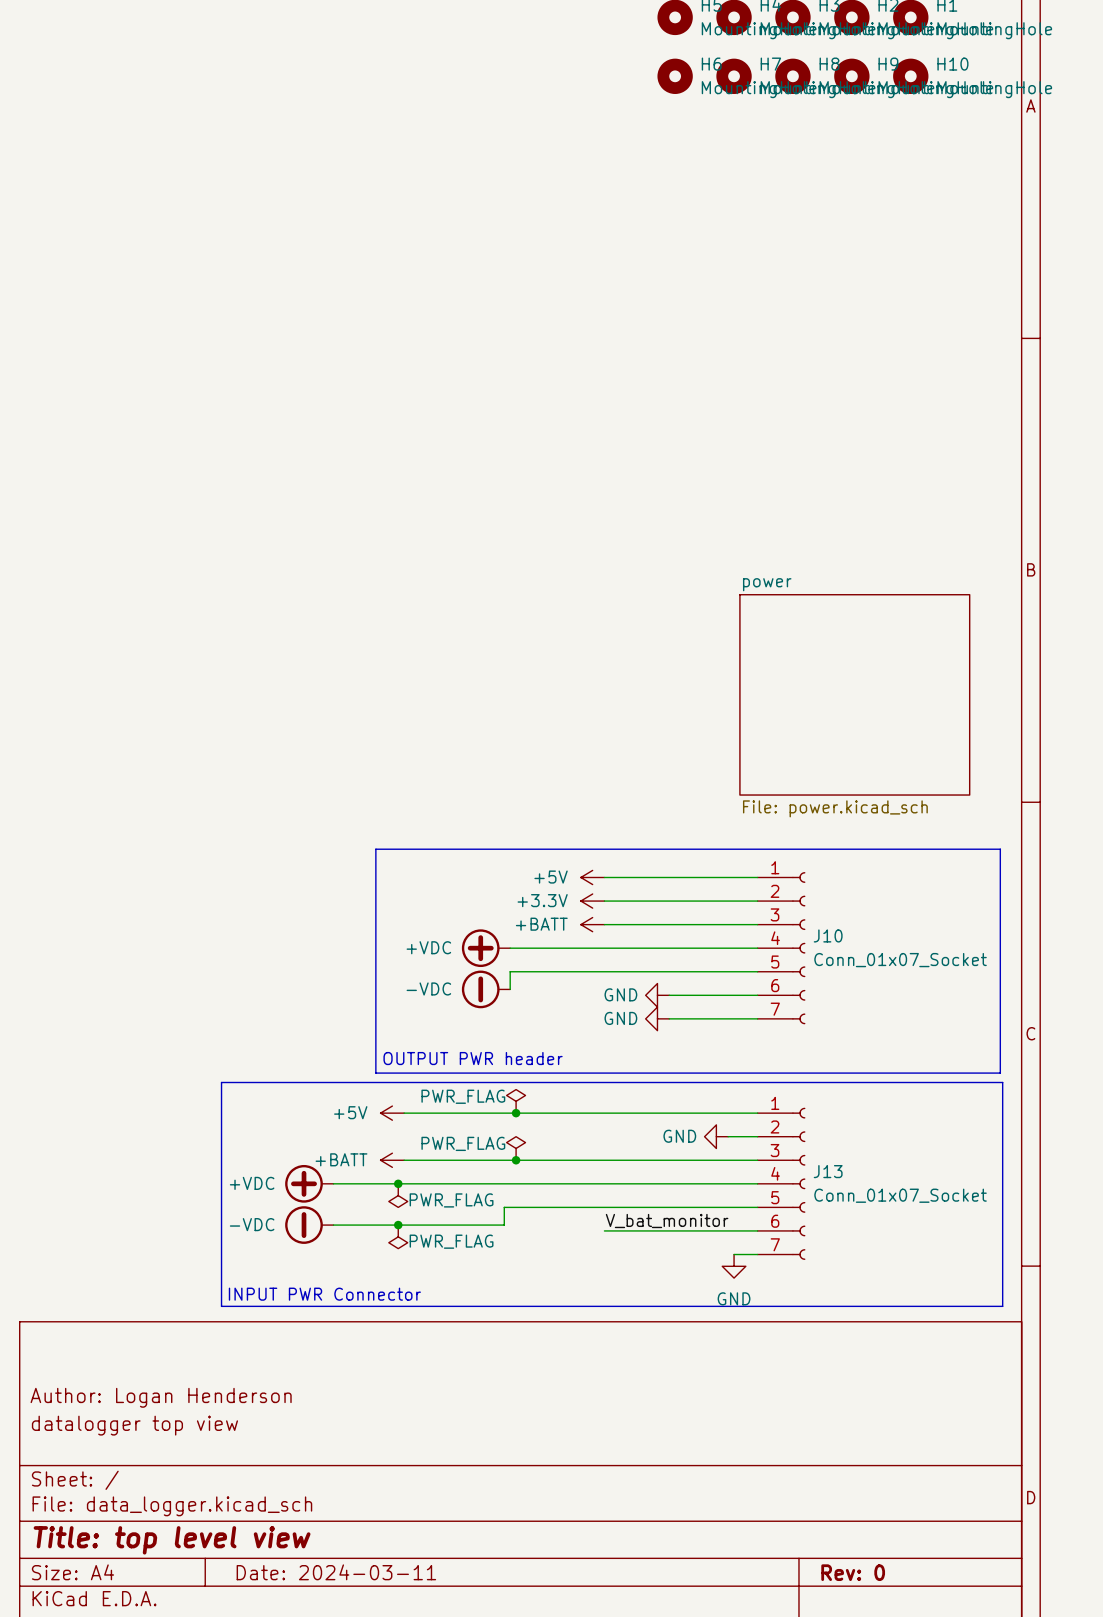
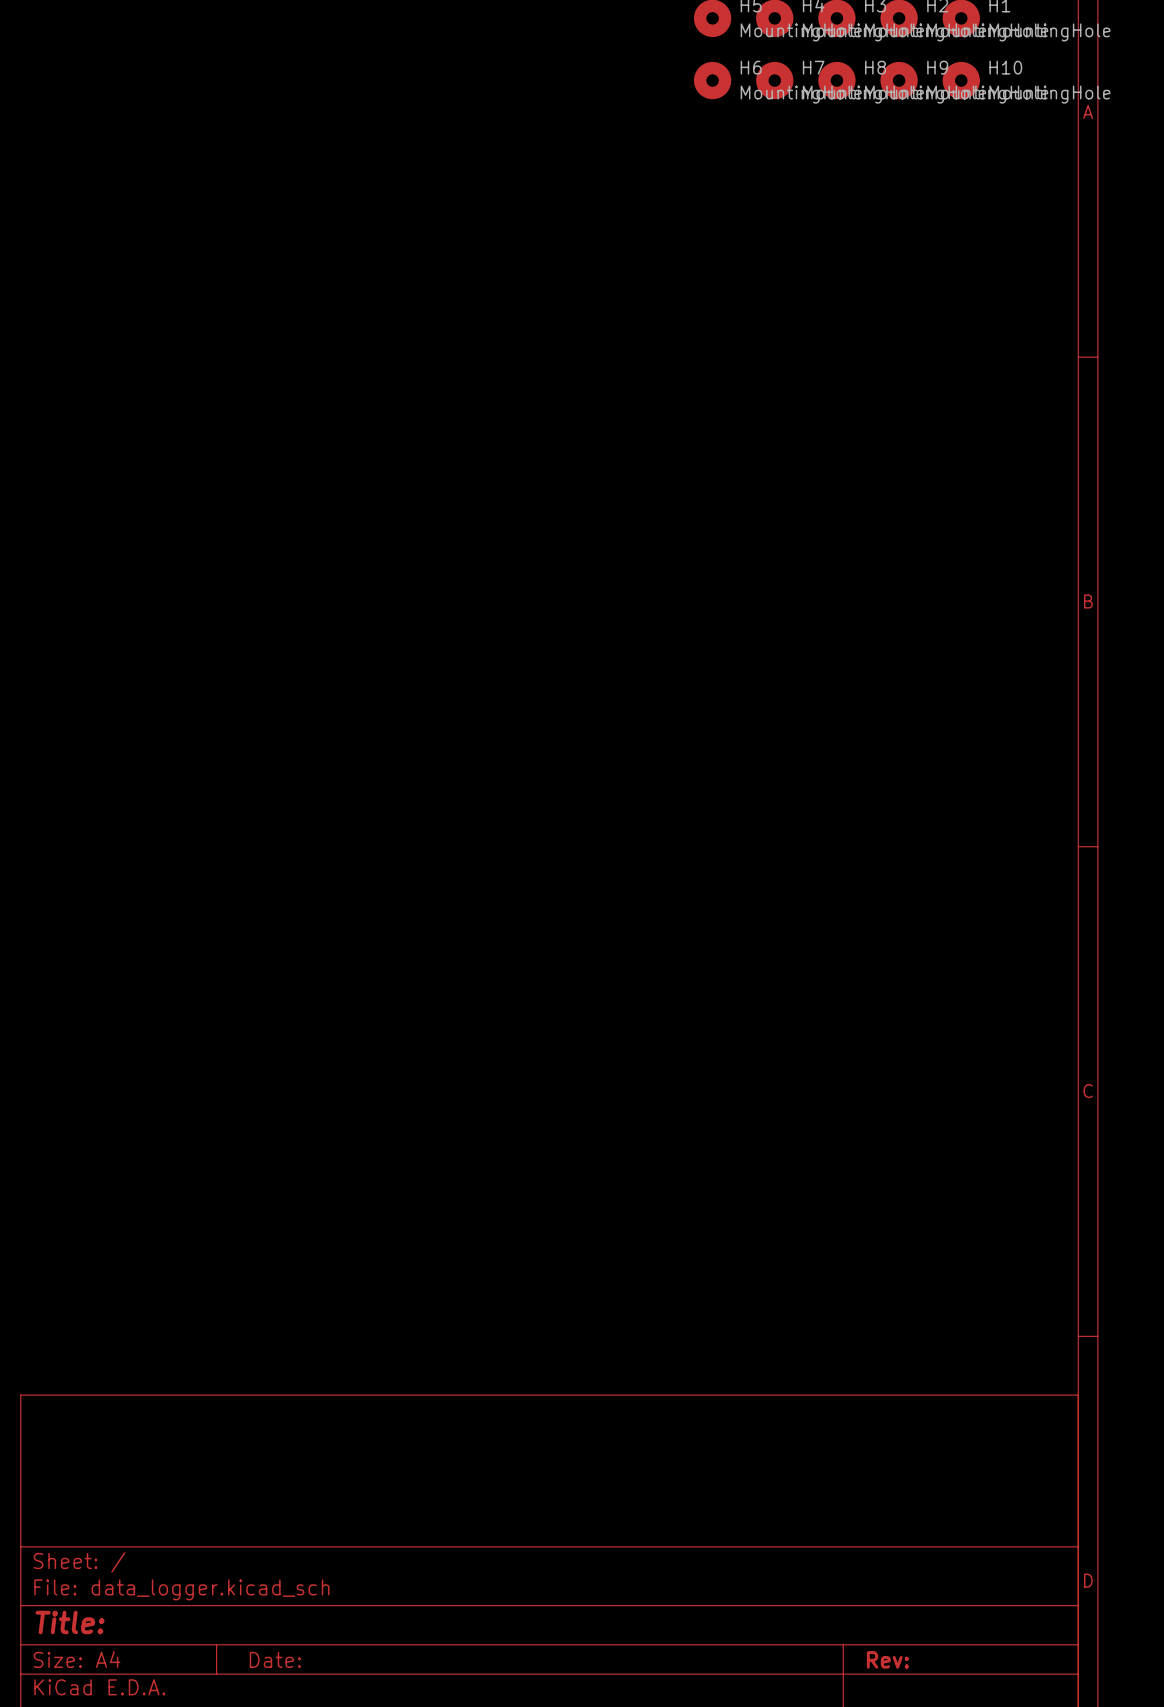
sheet power: File: power.kicad_sch (854, 694) -> none
line: (375, 849) (1000, 849) (1000, 1073) (375, 1073) (375, 849) -> none
power symbol: +5V (592, 877) -> none
wire: (604, 877) (757, 877) -> none
power symbol: +3.3V (592, 901) -> none
wire: (604, 901) (757, 901) -> none
power symbol: +BATT (592, 924) -> none
wire: (604, 924) (757, 924) -> none
power symbol: +VDC (486, 948) -> none
wire: (510, 948) (757, 948) -> none
J10: Conn_01x07_Socket (781, 948) -> none
wire: (757, 971) (510, 971) (510, 989) -> none
power symbol: -VDC (486, 989) -> none
power symbol: GND (657, 995) -> none
wire: (669, 995) (757, 995) -> none
power symbol: GND (657, 1018) -> none
wire: (669, 1018) (757, 1018) -> none
text: OUTPUT PWR header (473, 1058) -> none
line: (221, 1082) (1002, 1082) (1002, 1306) (221, 1306) (221, 1082) -> none
power symbol: PWR_FLAG (516, 1101) -> none
power symbol: +5V (392, 1113) -> none
wire: (404, 1113) (757, 1113) -> none
junction: (516, 1113) -> none
power symbol: GND (716, 1136) -> none
wire: (728, 1136) (757, 1136) -> none
power symbol: PWR_FLAG (516, 1148) -> none
power symbol: +BATT (392, 1160) -> none
wire: (404, 1160) (757, 1160) -> none
junction: (516, 1160) -> none
power symbol: +VDC (309, 1183) -> none
wire: (333, 1183) (757, 1183) -> none
junction: (398, 1183) -> none
J13: Conn_01x07_Socket (781, 1183) -> none
power symbol: PWR_FLAG (398, 1195) -> none
wire: (757, 1207) (504, 1207) (504, 1225) (333, 1225) -> none
label: V_bat_monitor (667, 1221) -> none
power symbol: -VDC (309, 1225) -> none
junction: (398, 1225) -> none
wire: (604, 1230) (757, 1230) -> none
power symbol: PWR_FLAG (398, 1236) -> none
wire: (734, 1254) (757, 1254) -> none
power symbol: GND (734, 1266) -> none
text: INPUT PWR Connector (324, 1294) -> none
title block: Author: Logan Henderson (161, 1397) -> none
title block: datalogger top view (134, 1425) -> none
title block: Title: top level view (172, 1540) -> Title: (70, 1622)
title block: Date: 2024-03-11 (336, 1572) -> Date: (275, 1659)
title block: Rev: 0 (853, 1572) -> Rev: (887, 1659)

